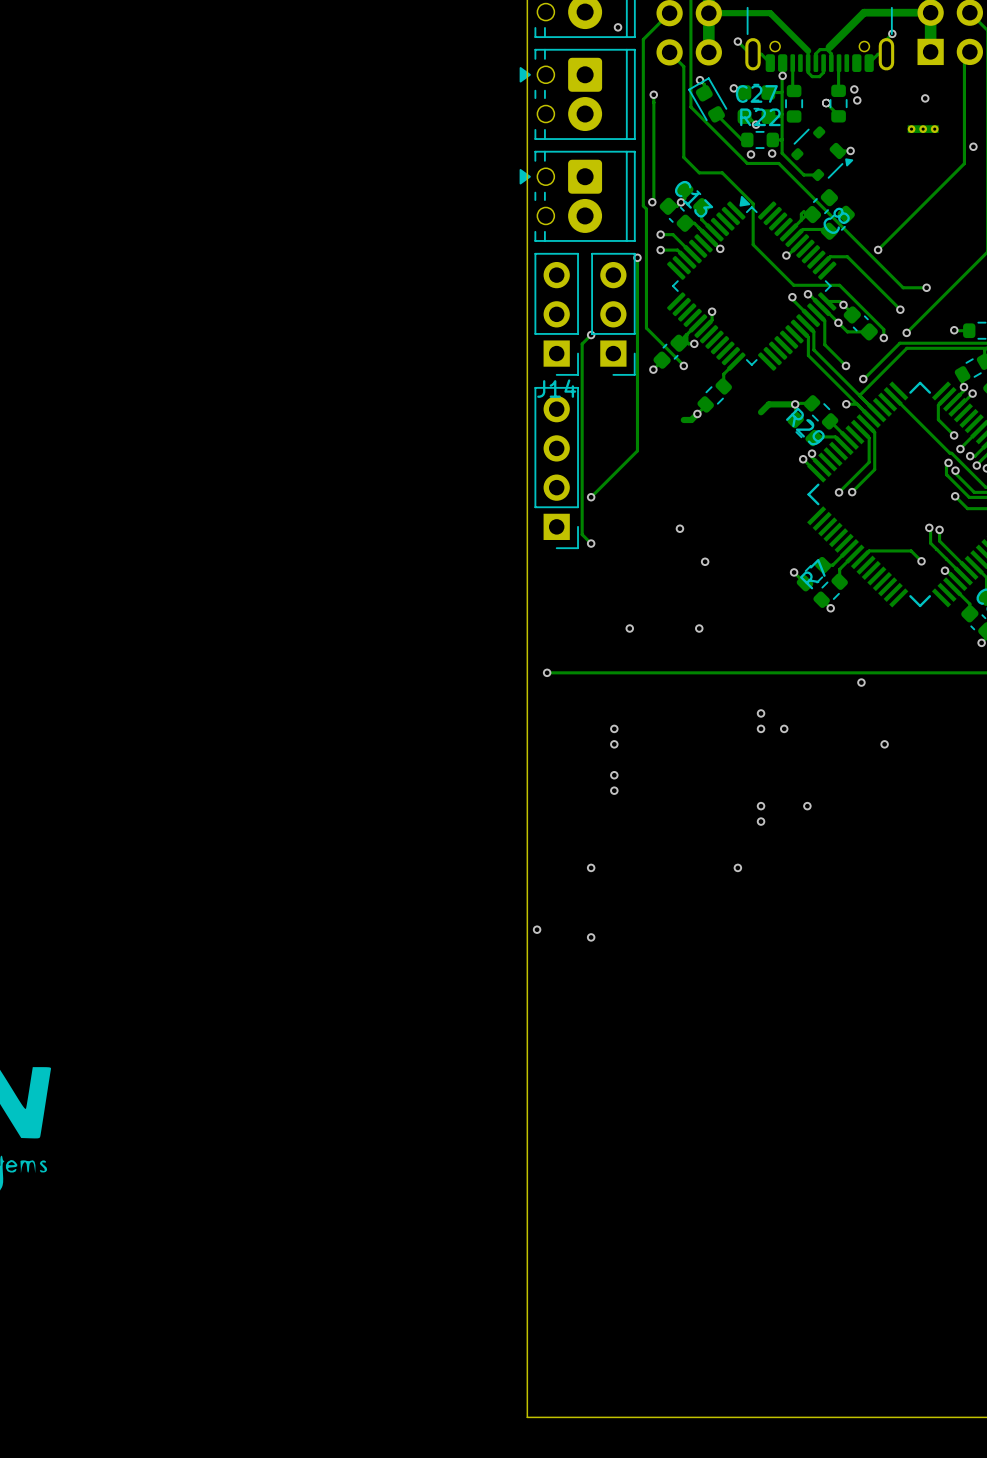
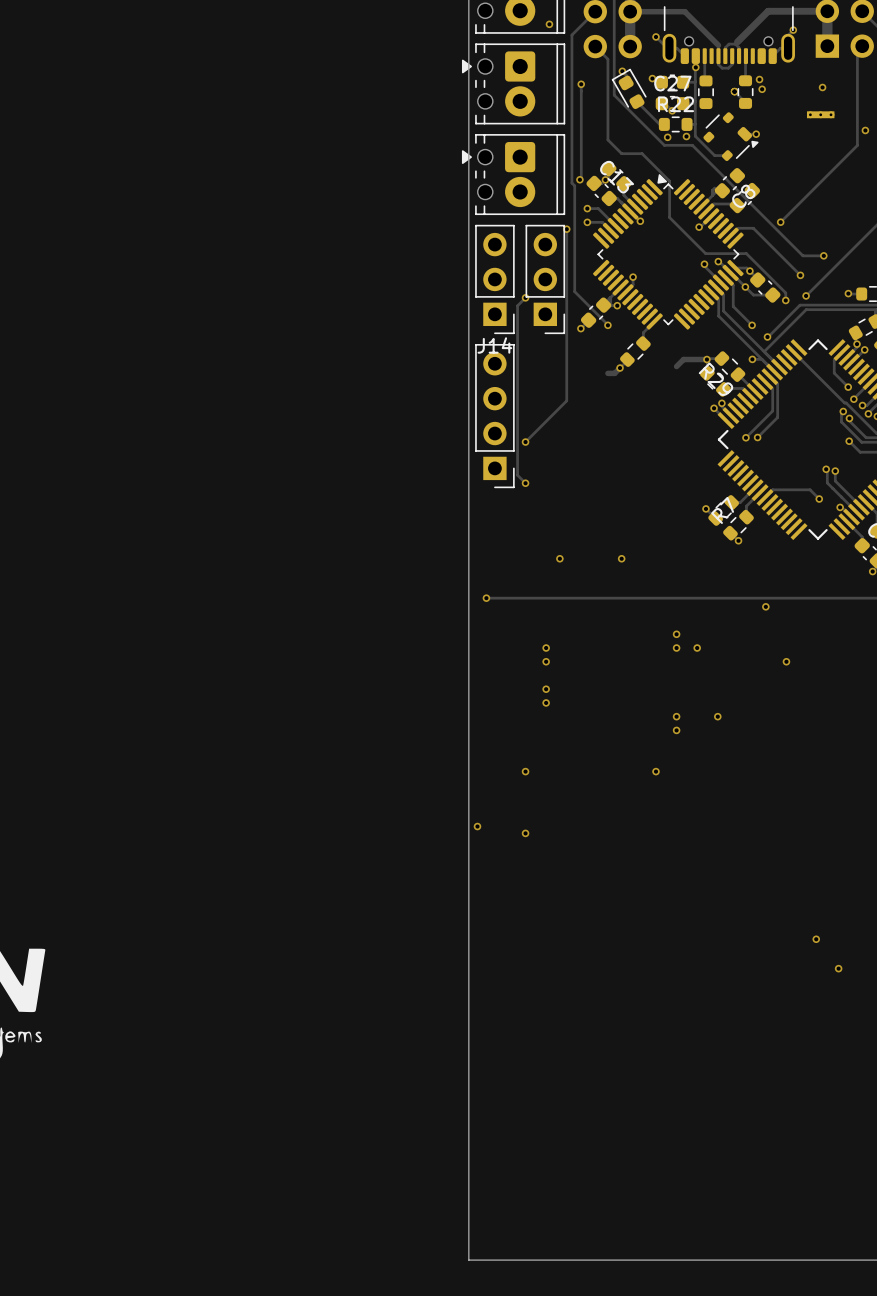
via: (679, 528) -> none
via: (705, 561) -> none
via: none -> (816, 939)
via: none -> (838, 968)

